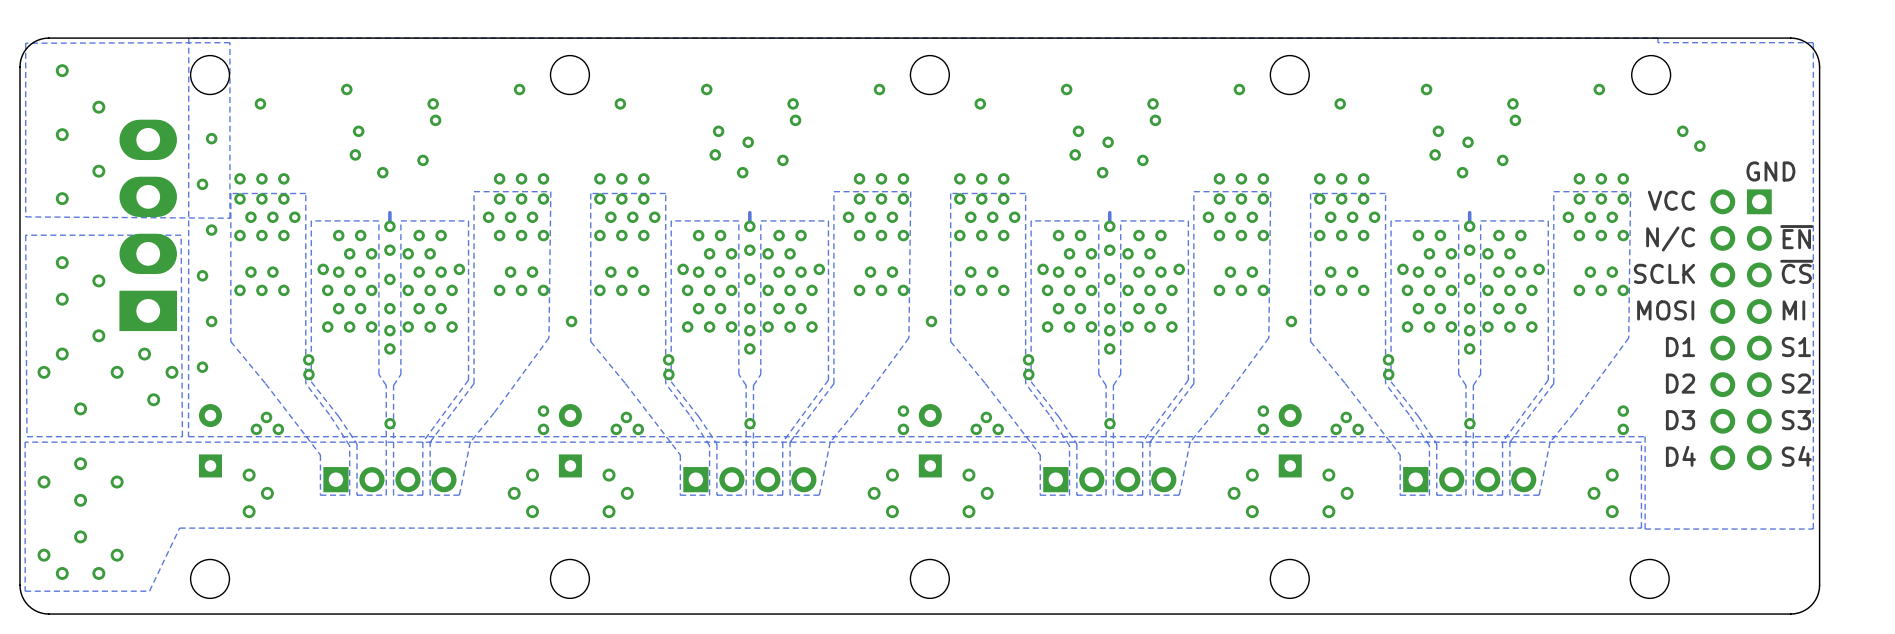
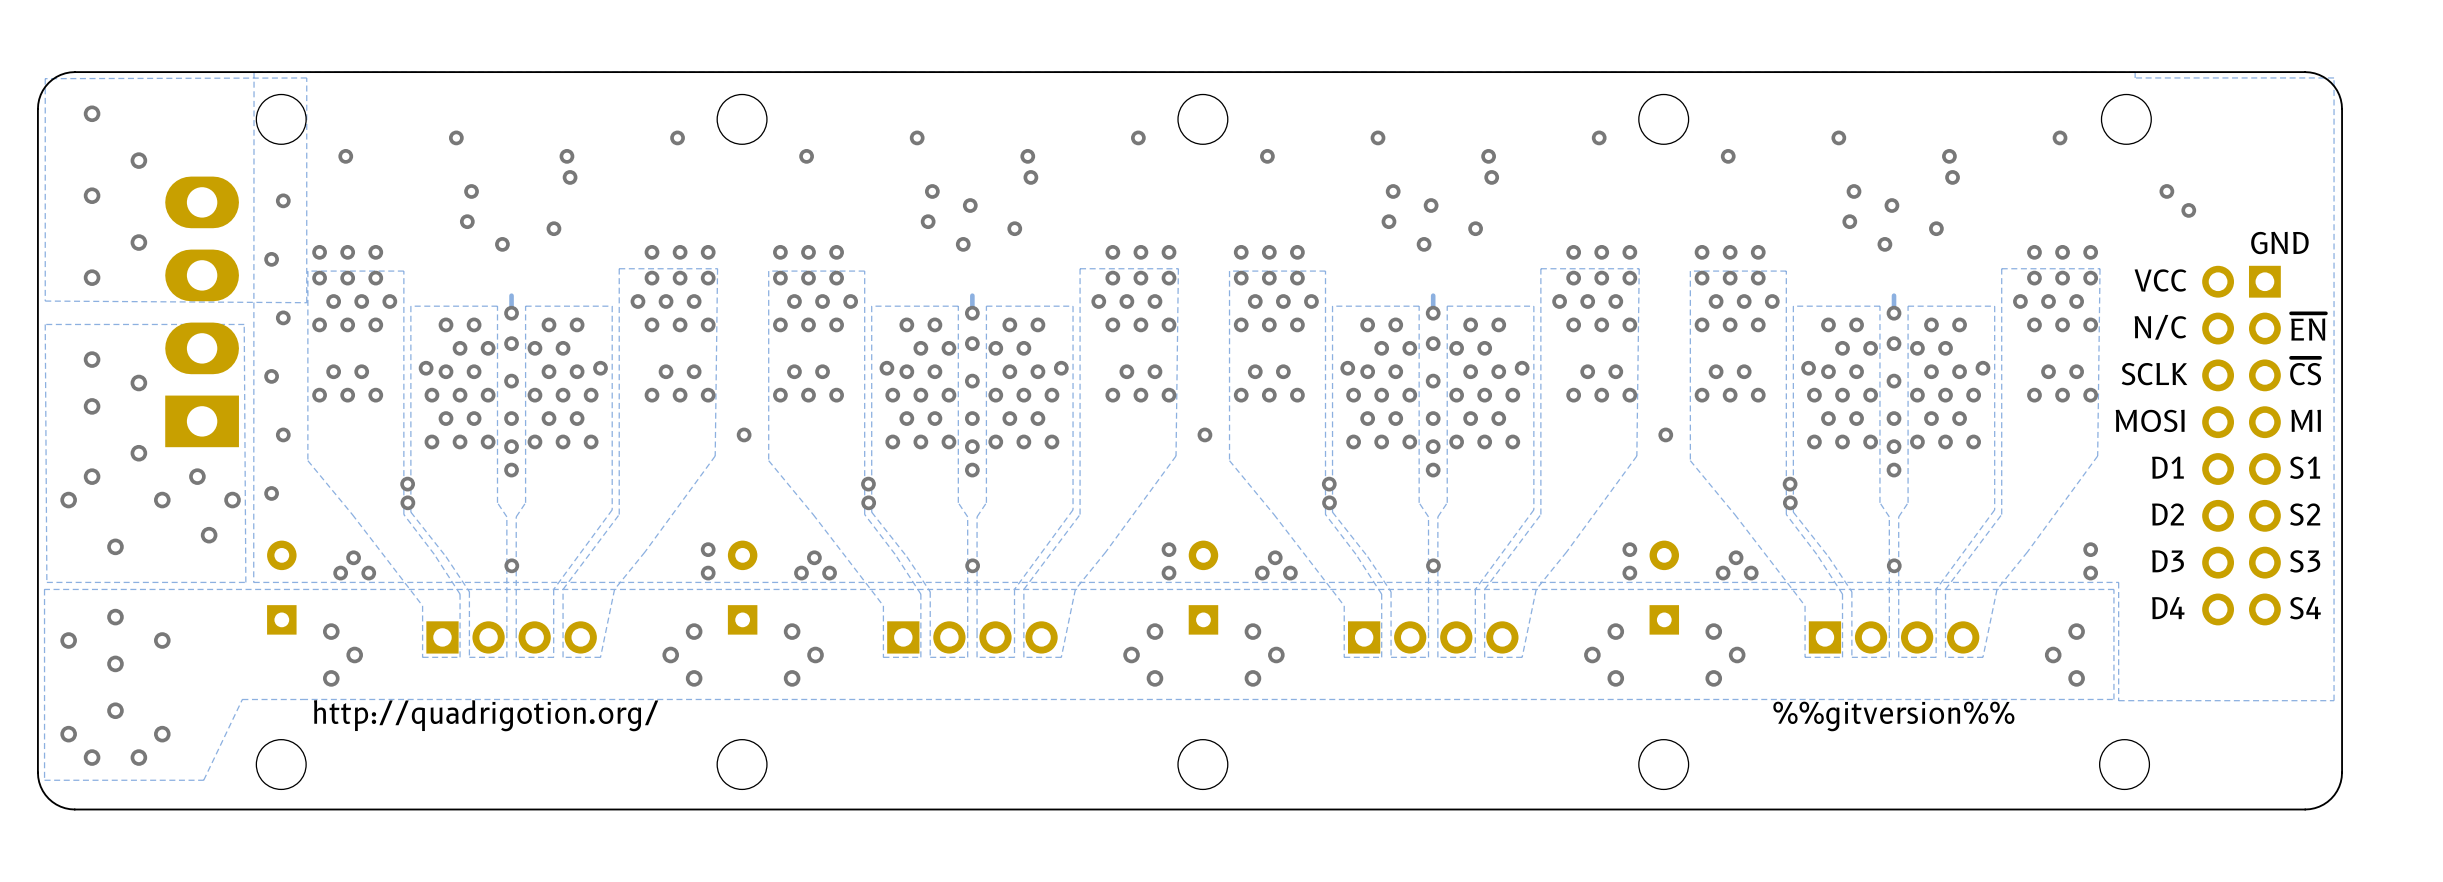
text: none -> http://quadrigotion.org/ (486, 715)
text: none -> %%gitversion%% (1893, 716)

